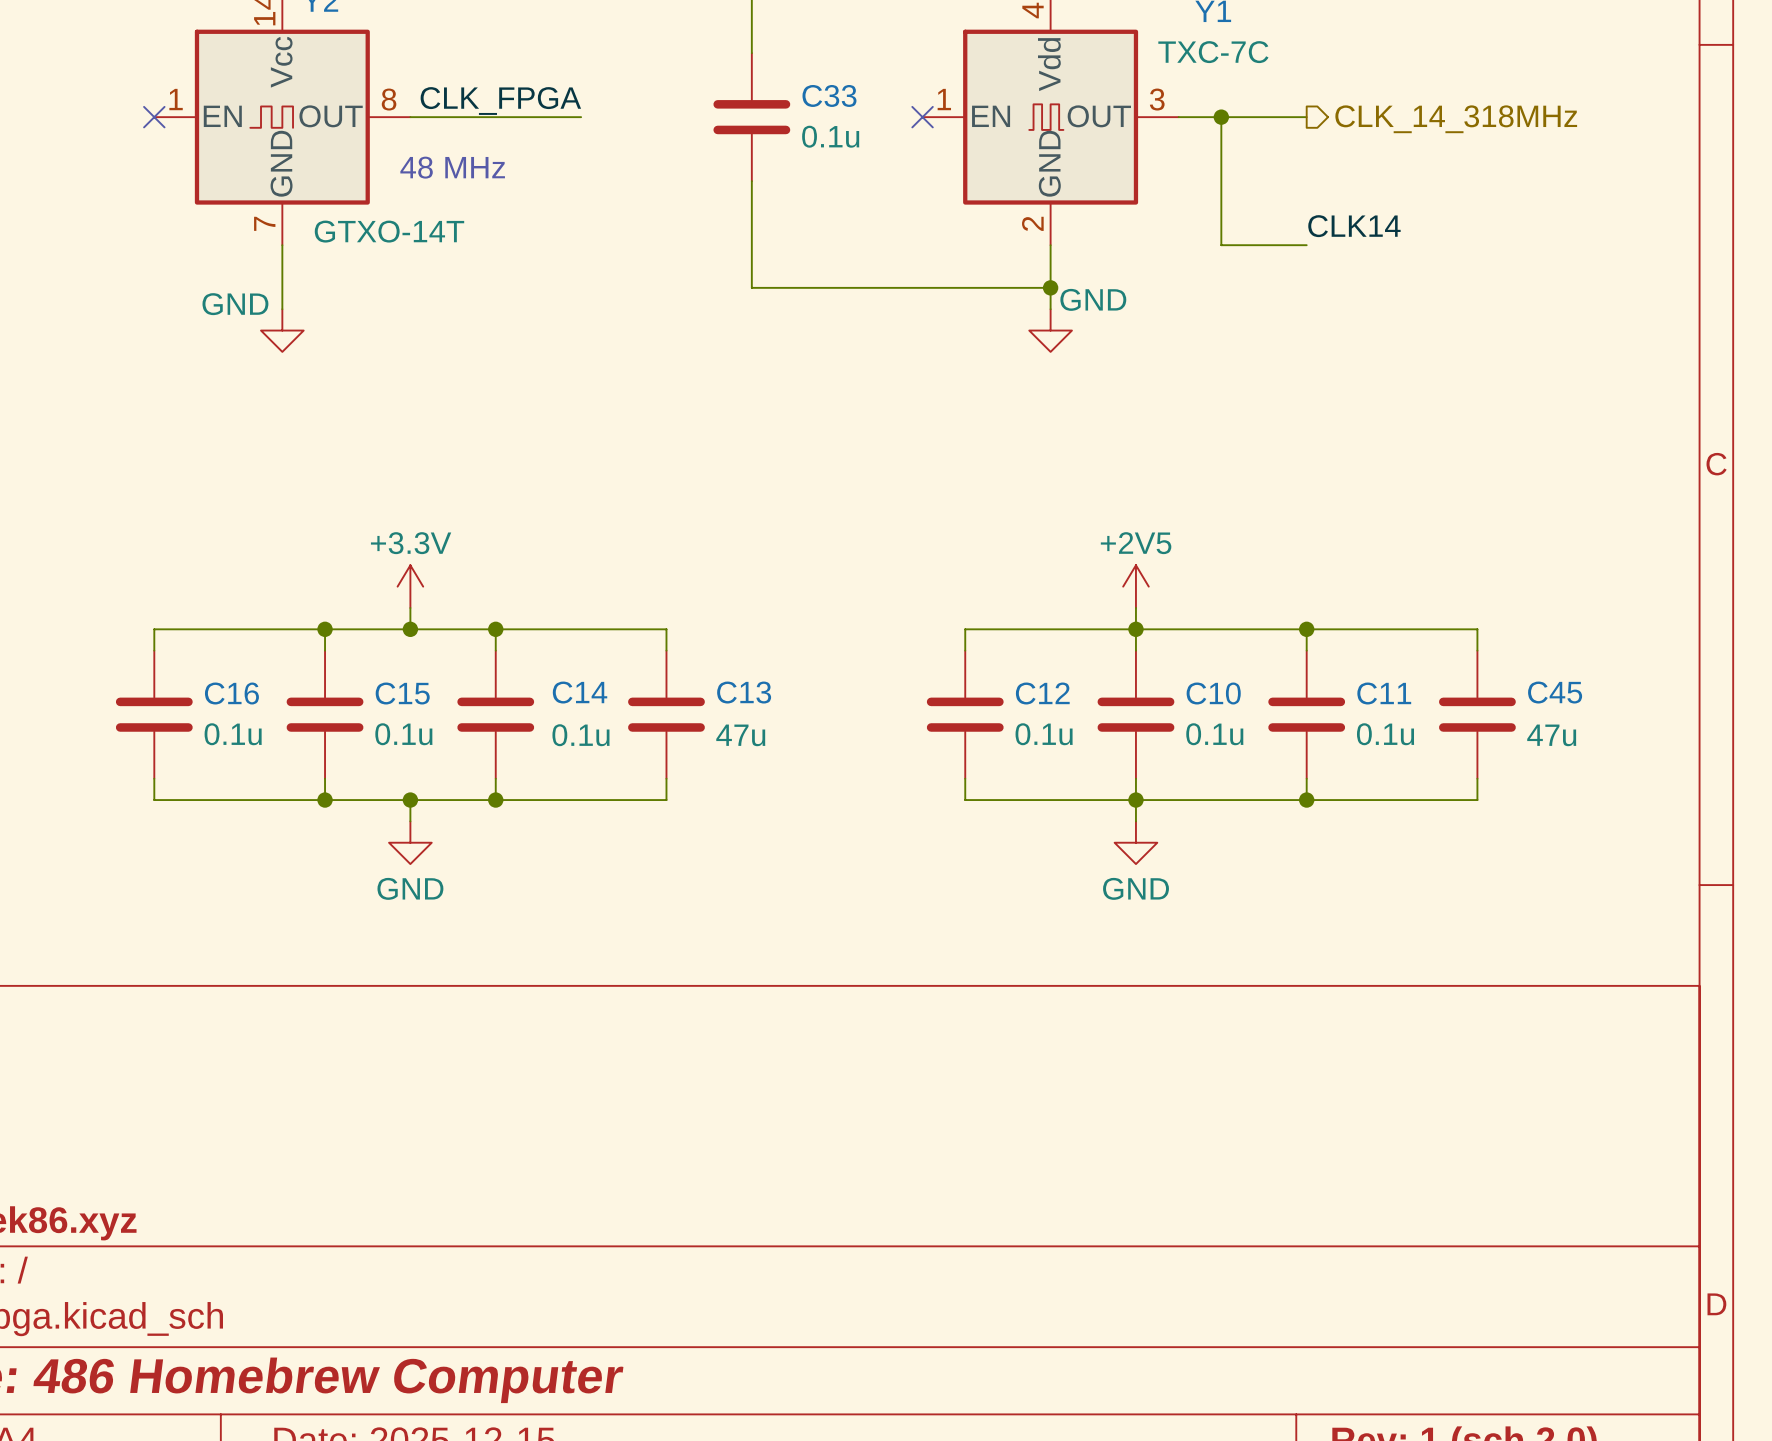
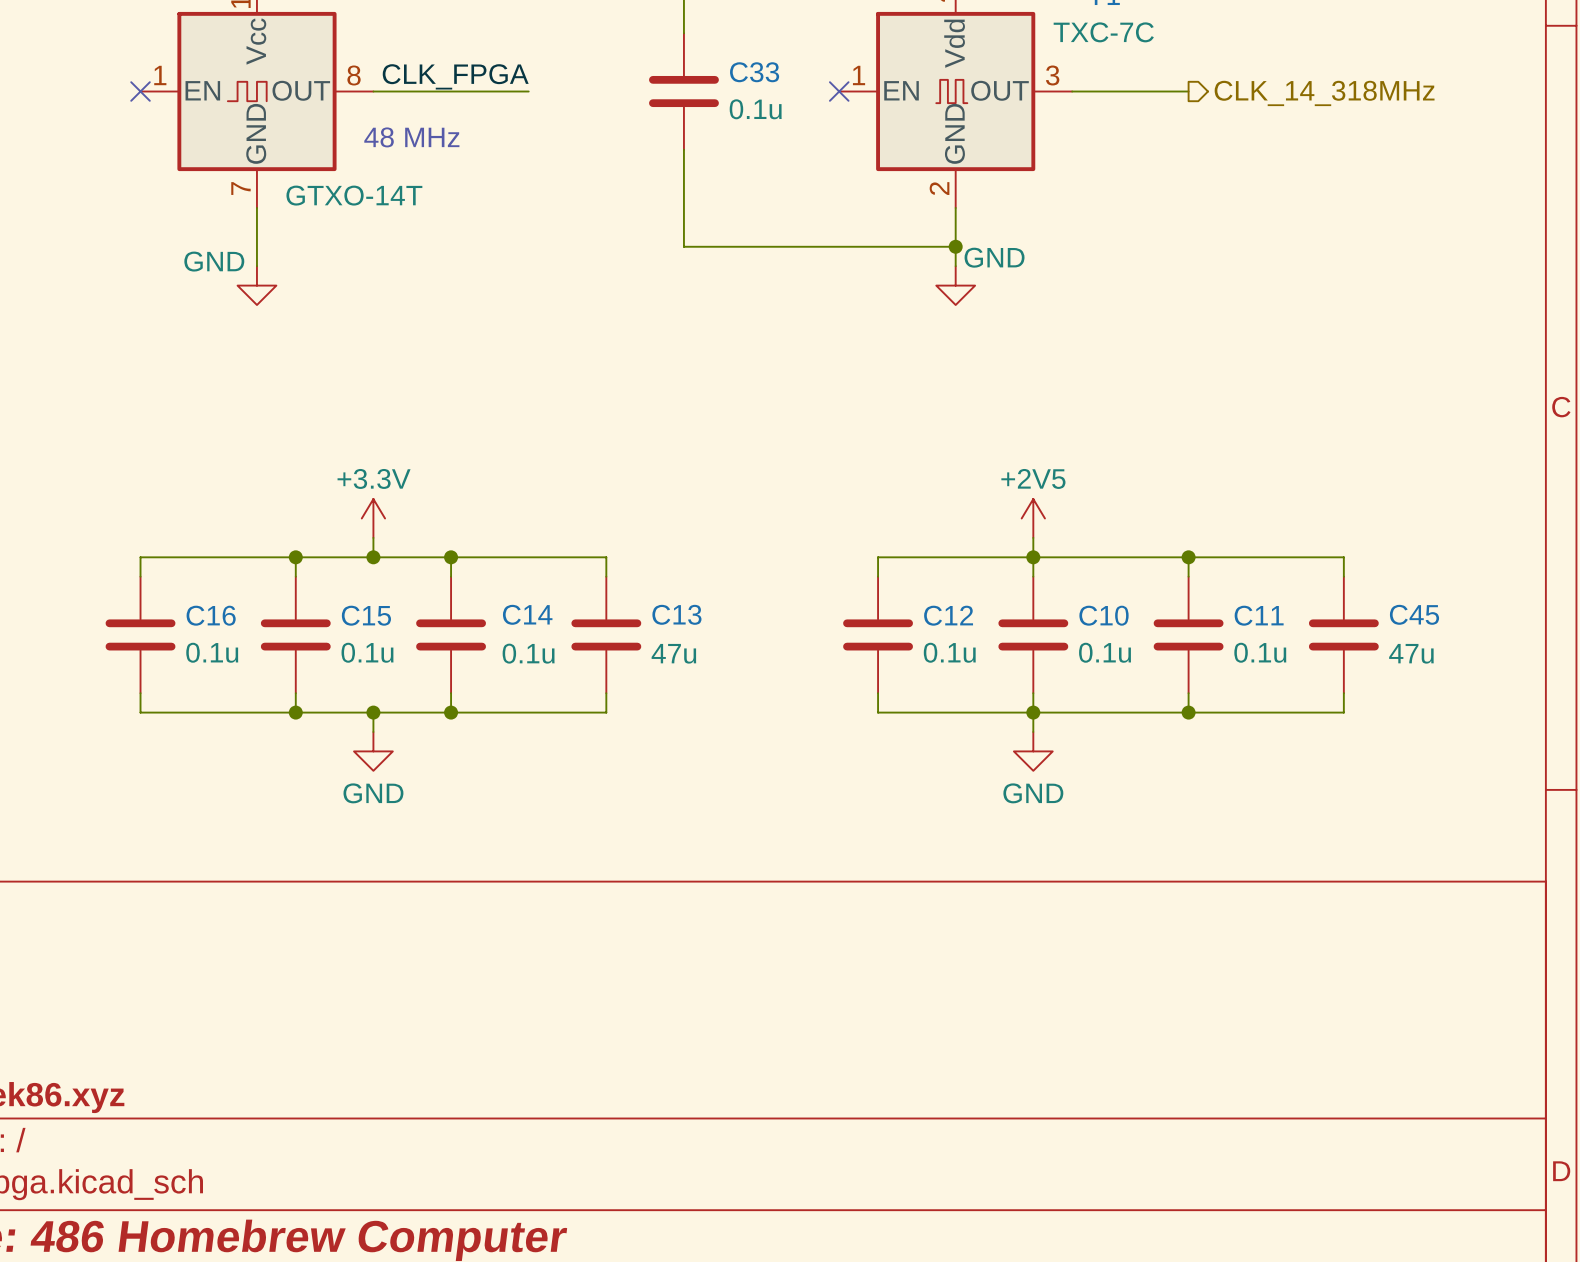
wire: (1221, 117) (1221, 245) (1306, 245) -> none
junction: (1221, 117) -> none
label: CLK14 (1354, 226) -> none

